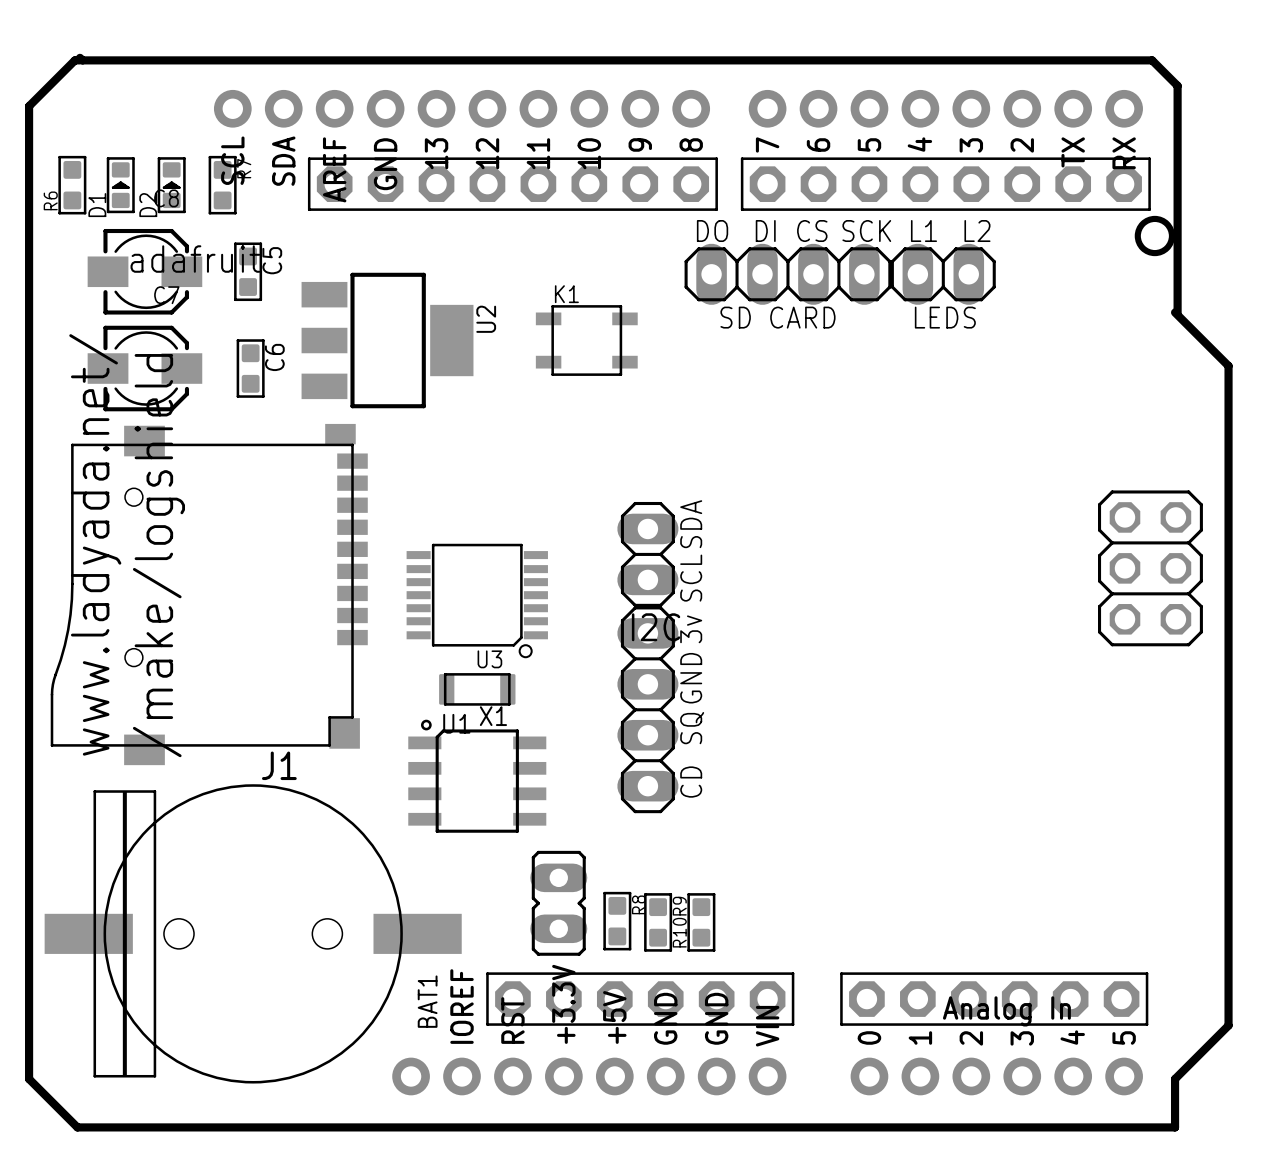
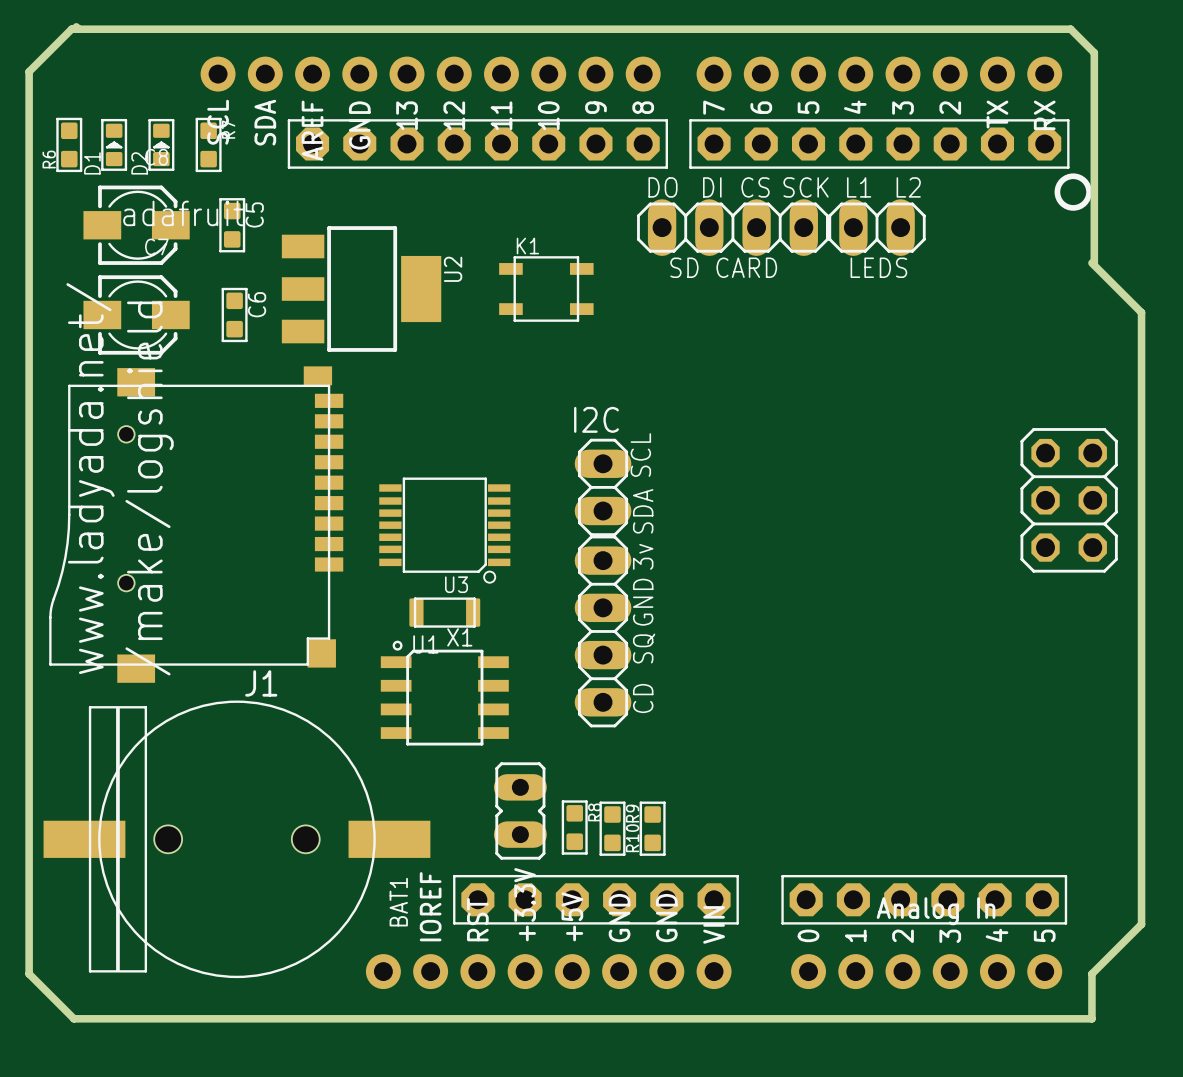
text position: SDA (691, 524) -> SDA (643, 511)
text position: SCL (691, 578) -> SCL (640, 455)
I2C name position: I2C (656, 627) -> I2C (596, 419)

